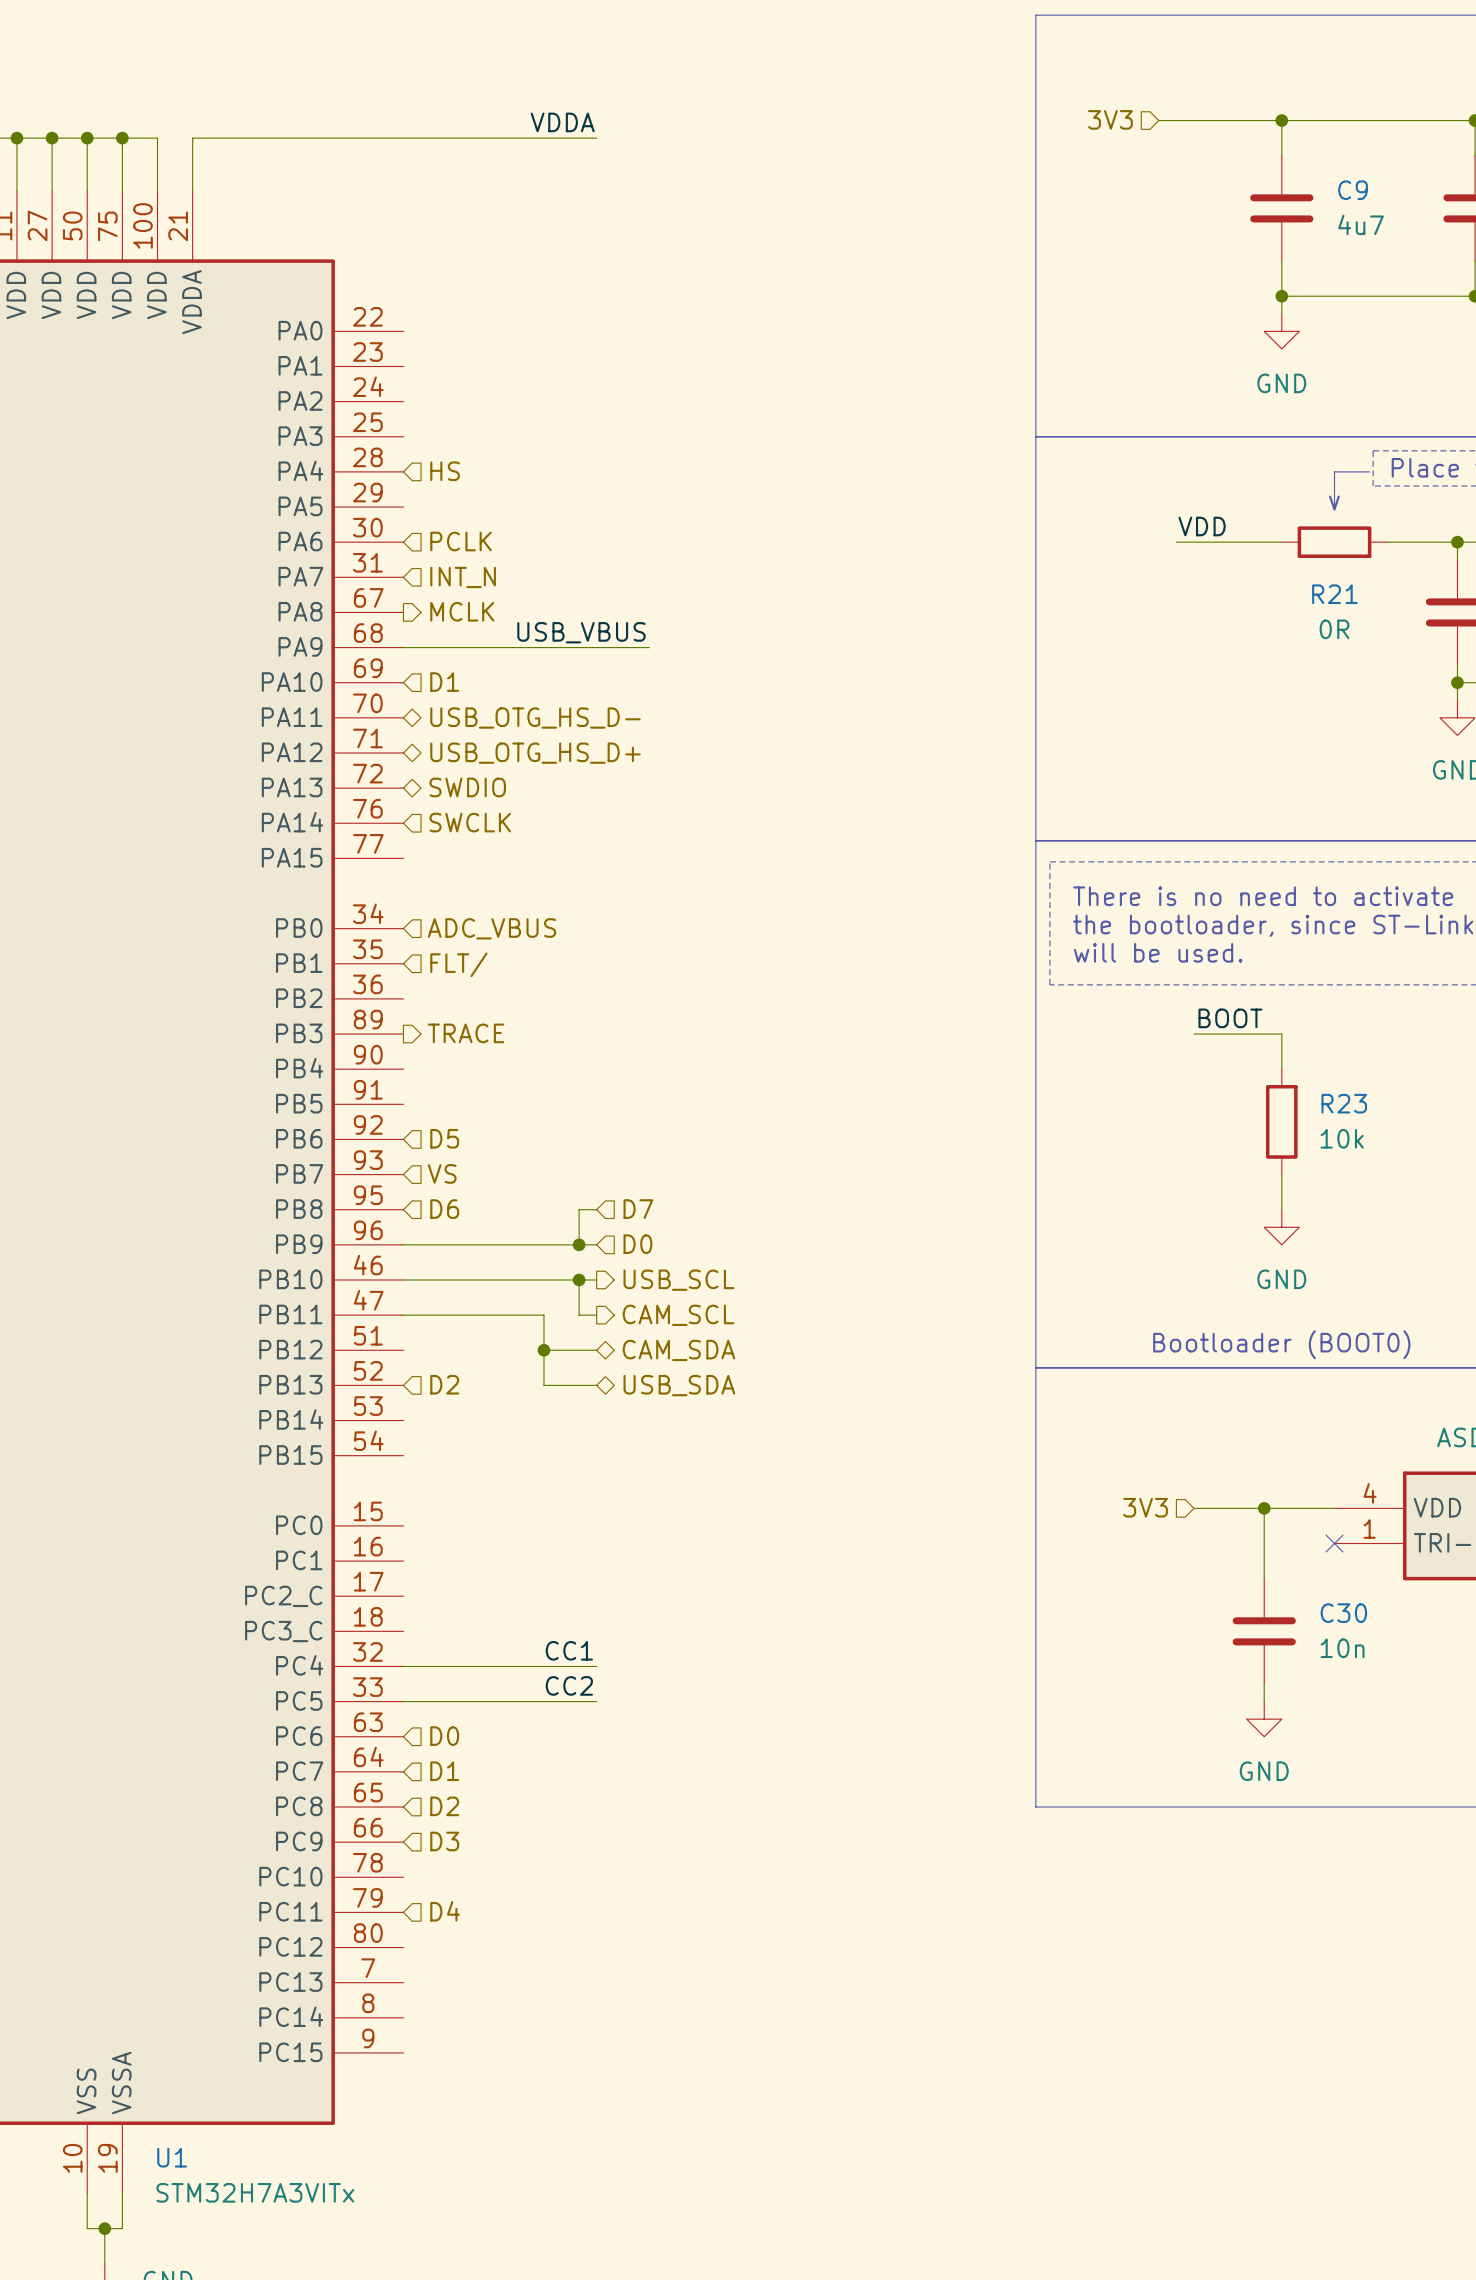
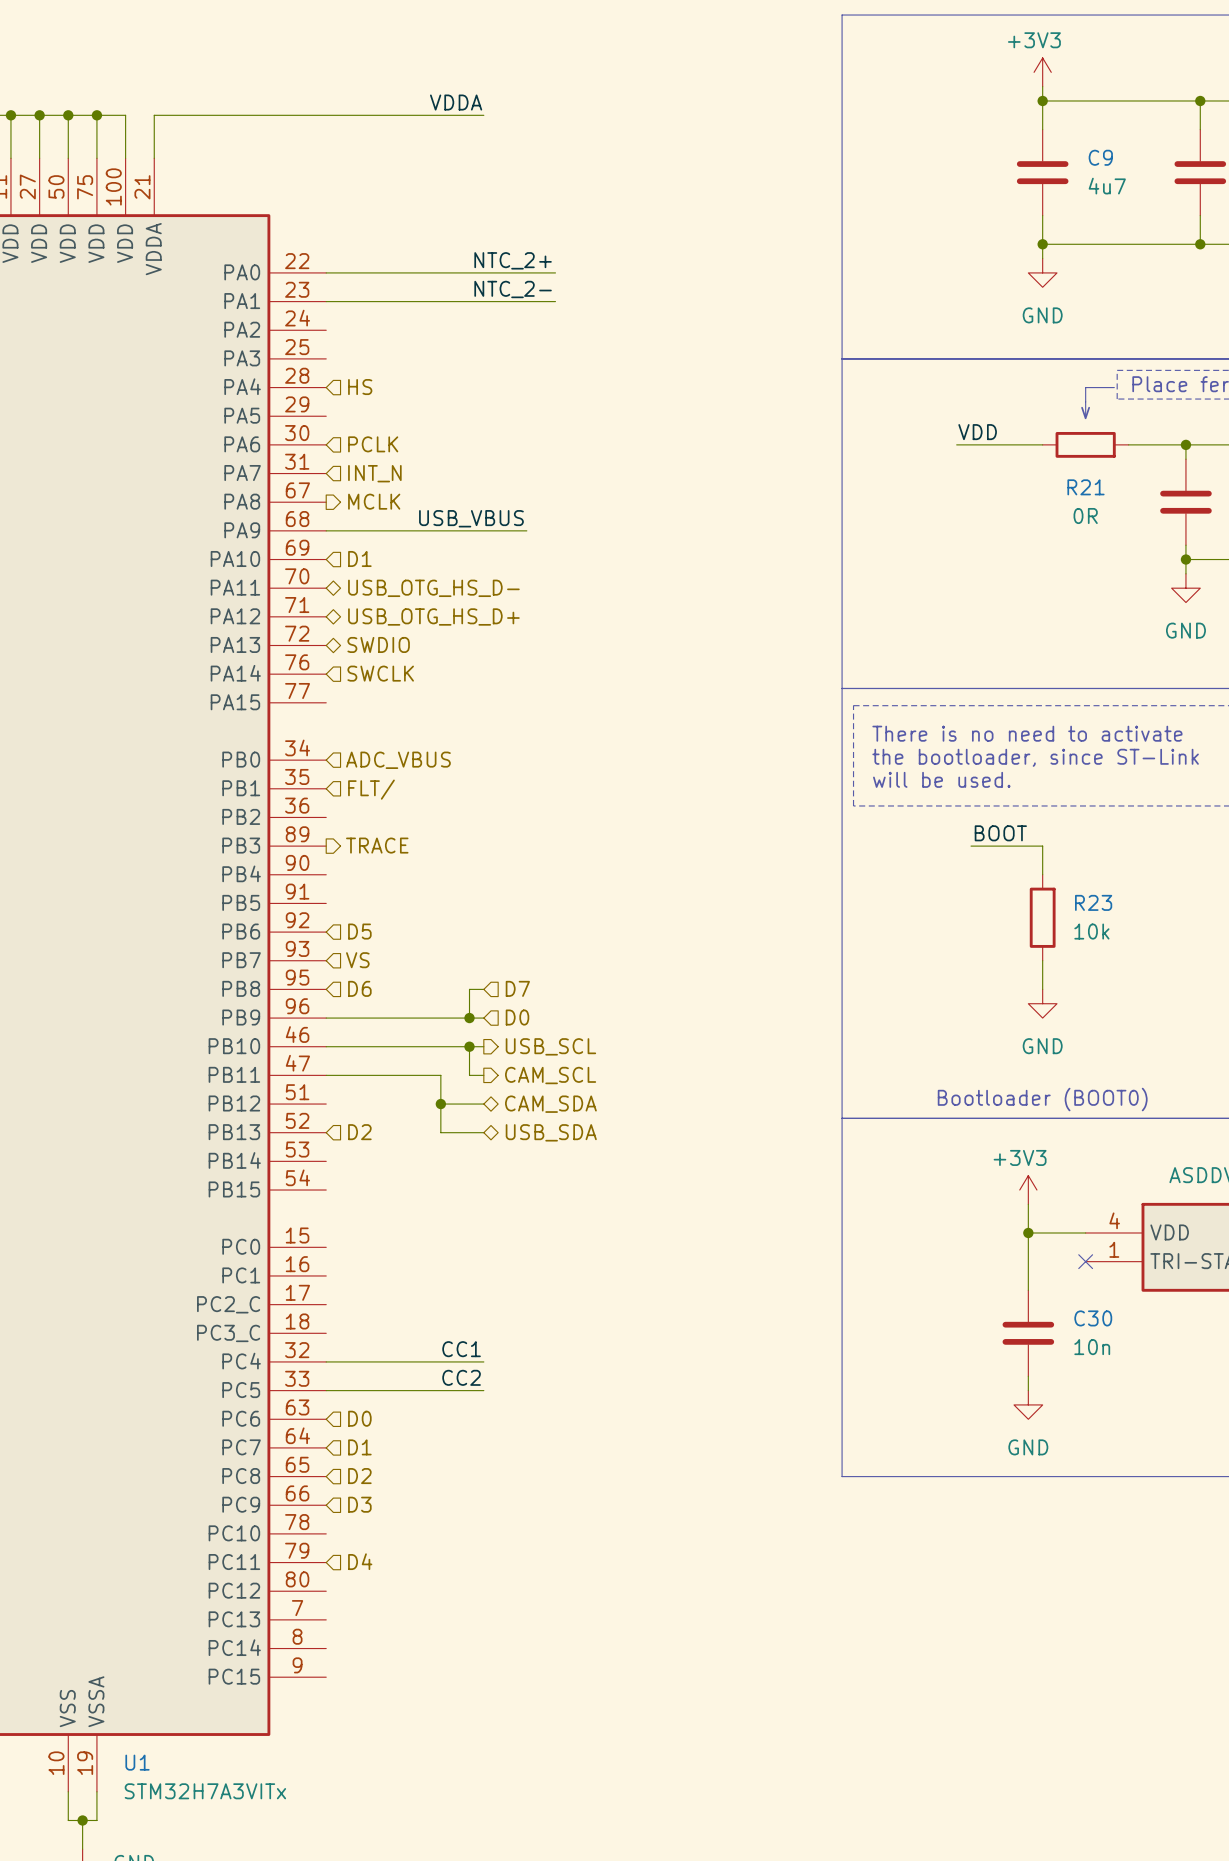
power symbol: none -> +3V3 (1042, 72)
hierarchical label: 3V3 (1110, 119) -> none
wire: (1158, 120) (1281, 120) -> (1042, 86) (1042, 100)
label: none -> NTC_2+ (513, 260)
wire: none -> (326, 272) (555, 272)
label: none -> NTC_2- (513, 289)
wire: none -> (326, 301) (555, 301)
power symbol: none -> +3V3 (1028, 1190)
hierarchical label: 3V3 (1145, 1507) -> none
wire: (1193, 1508) (1264, 1508) -> (1028, 1204) (1028, 1232)

